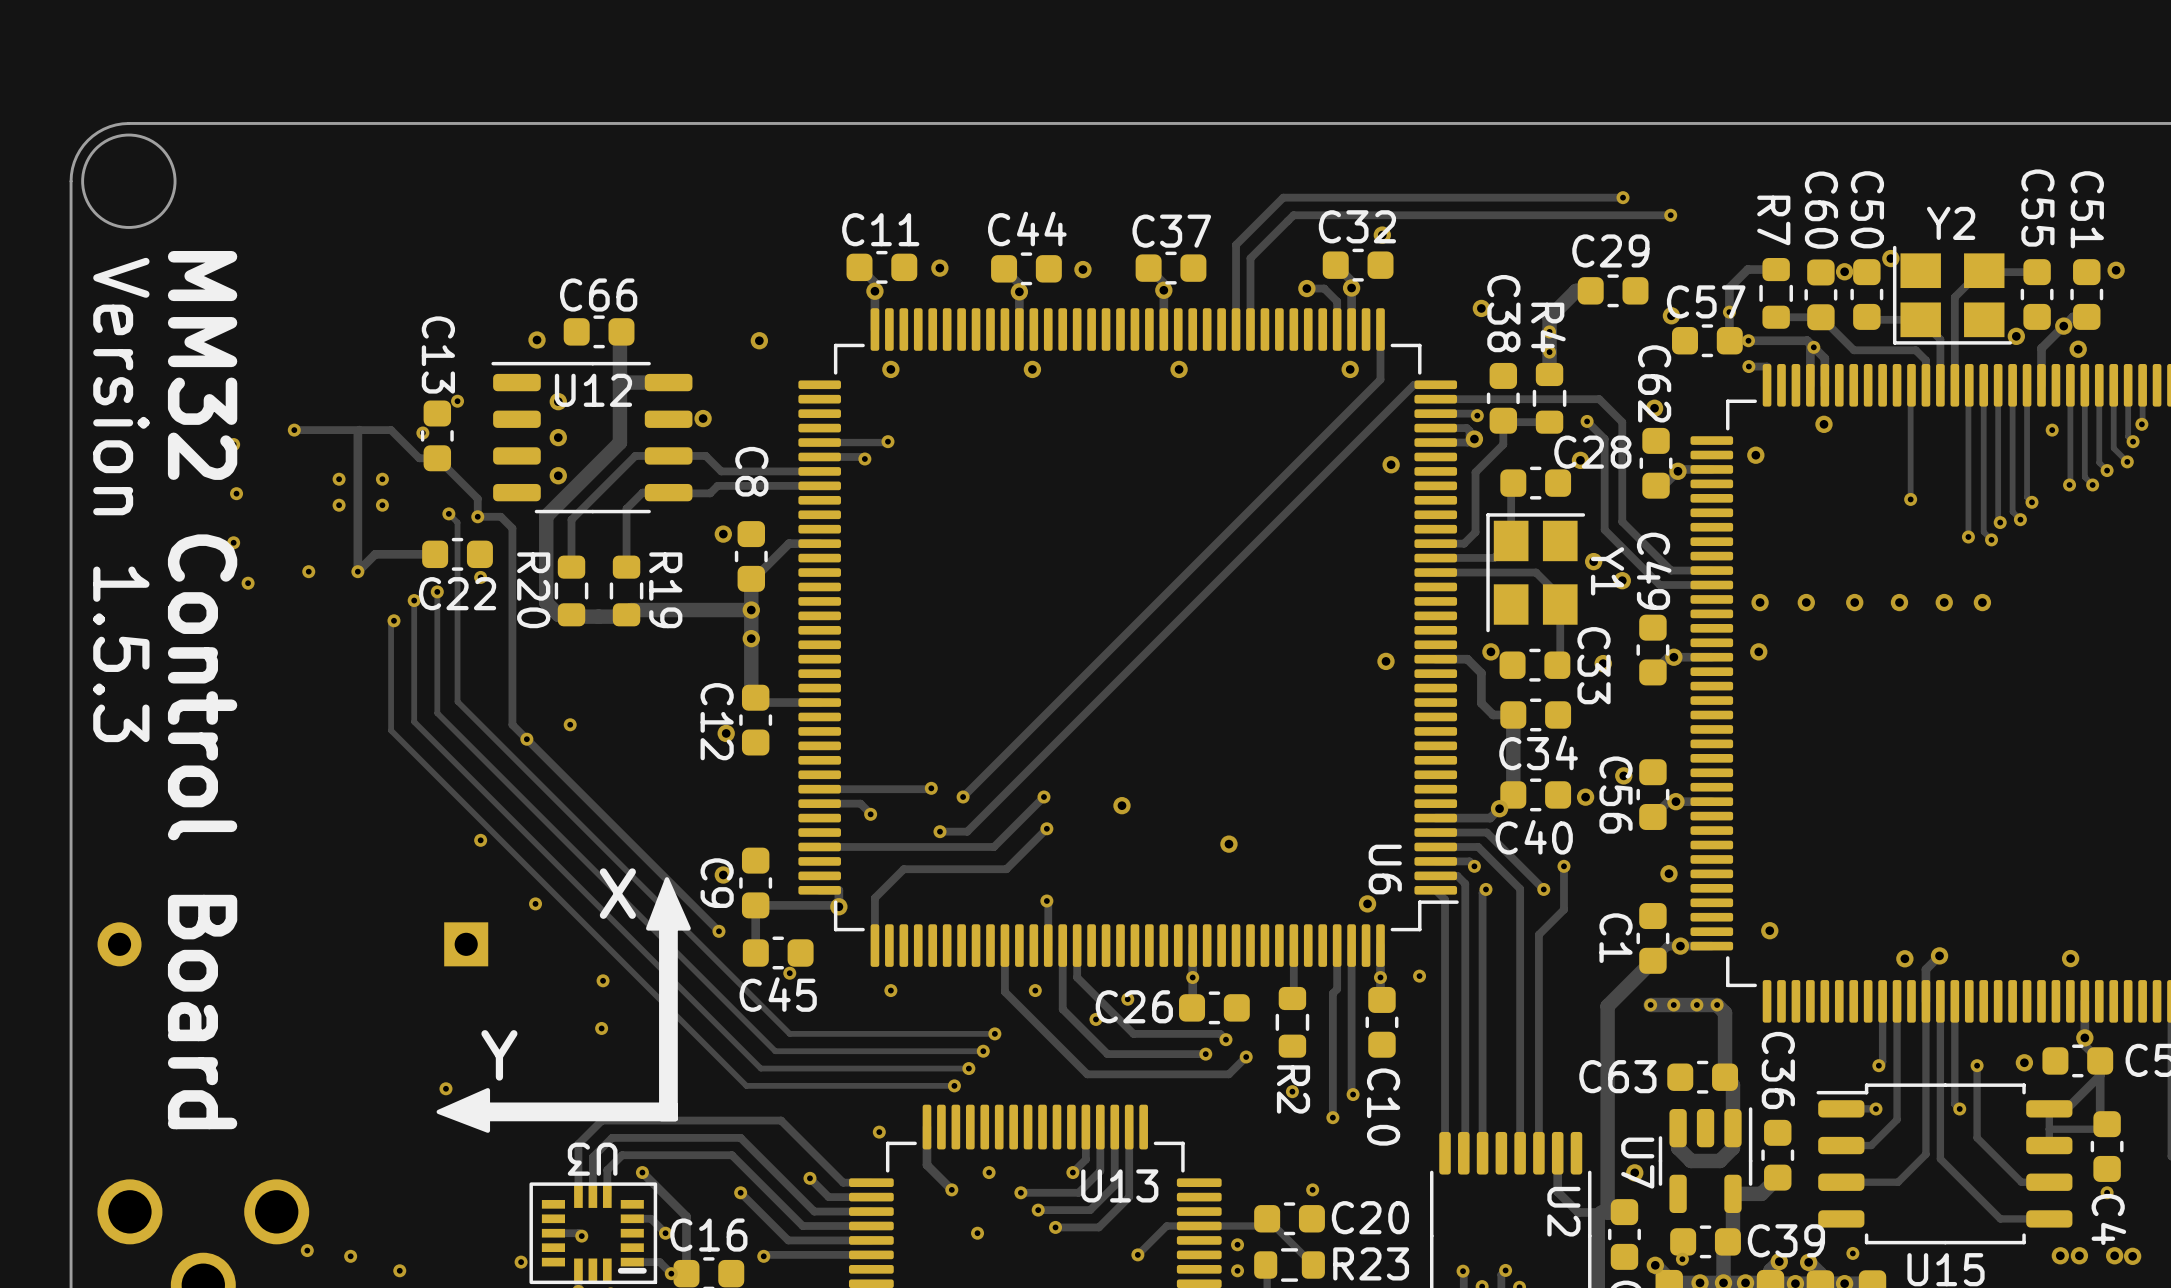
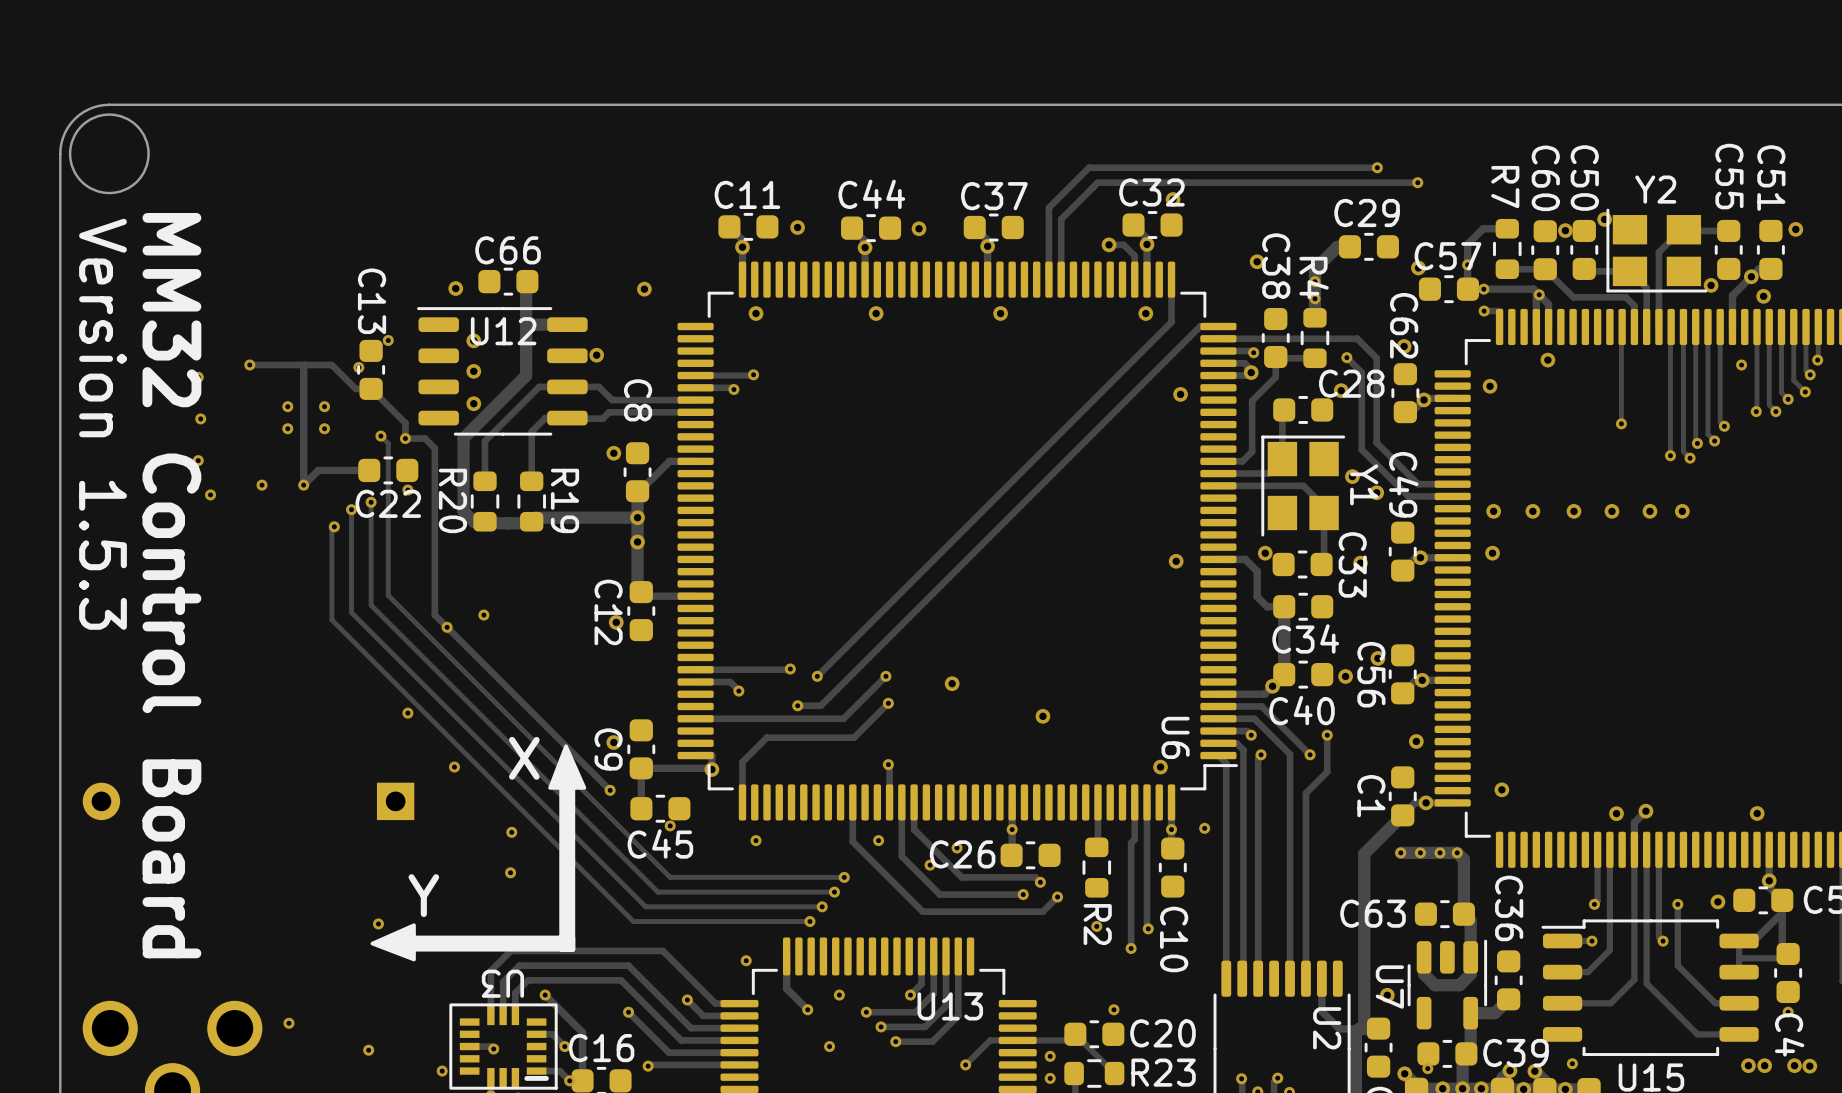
via: none -> (288, 1023)
via: none -> (368, 1050)
via: (307, 1250) -> none
via: (350, 1256) -> none
via: (399, 1270) -> none

